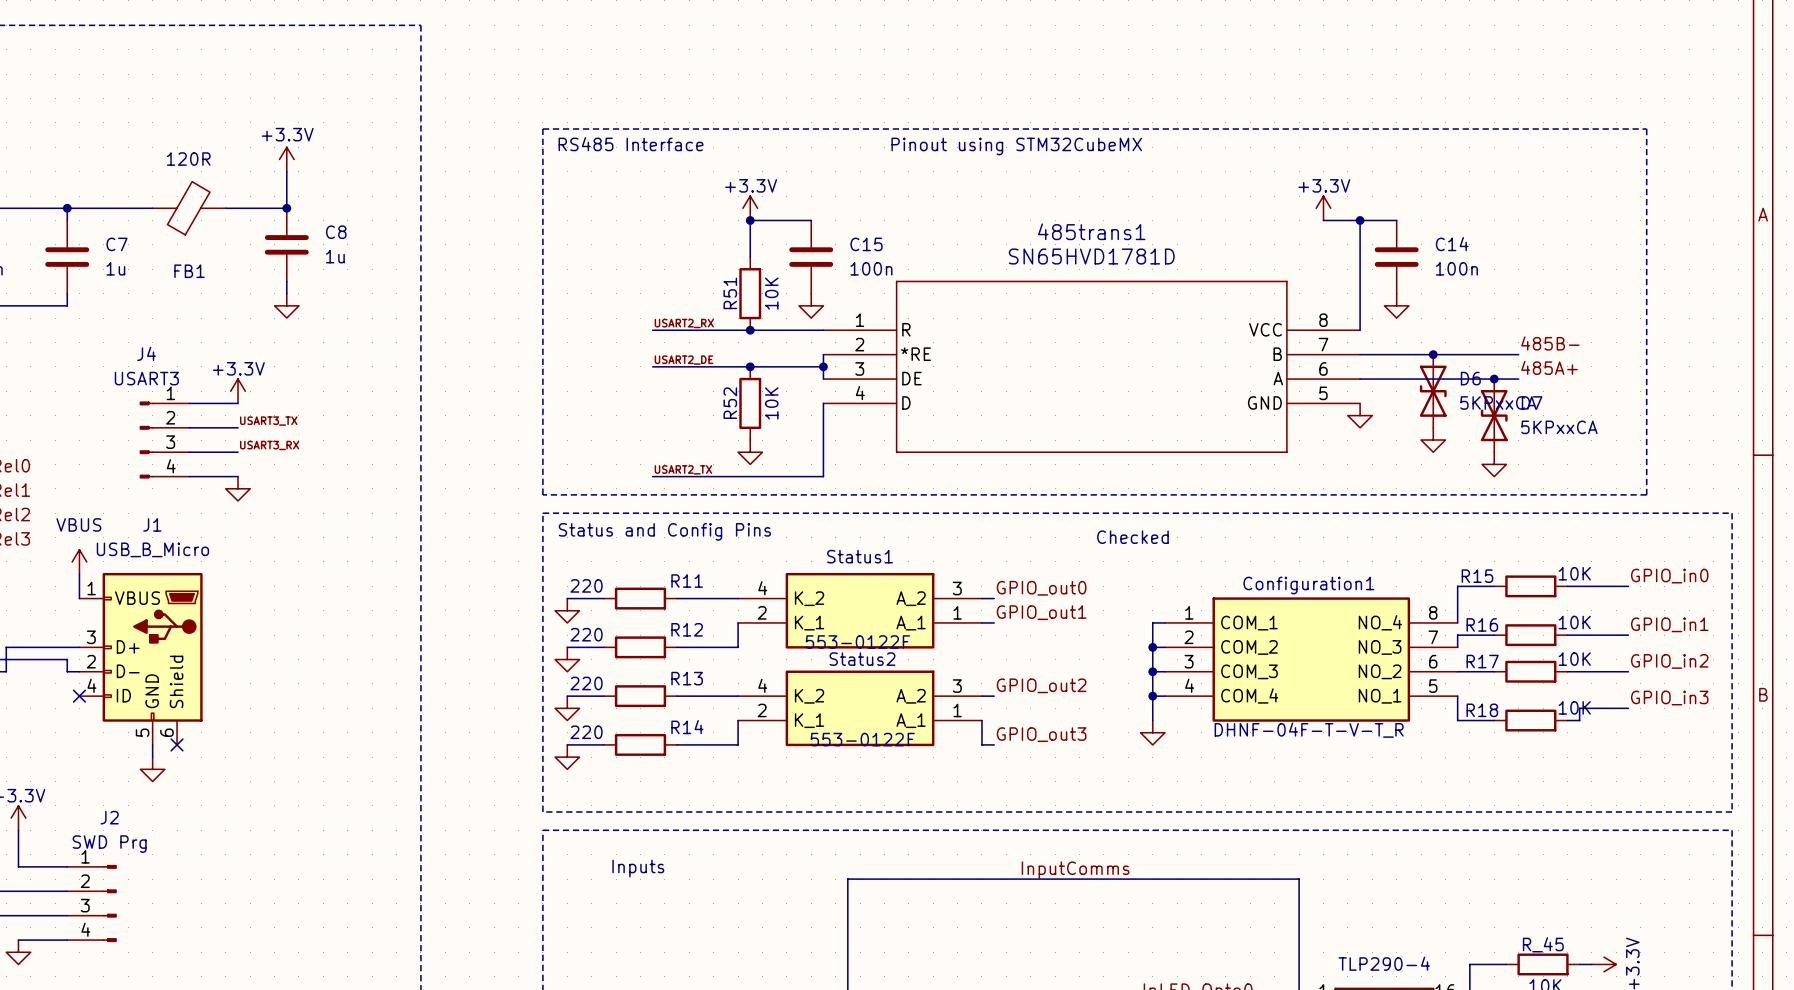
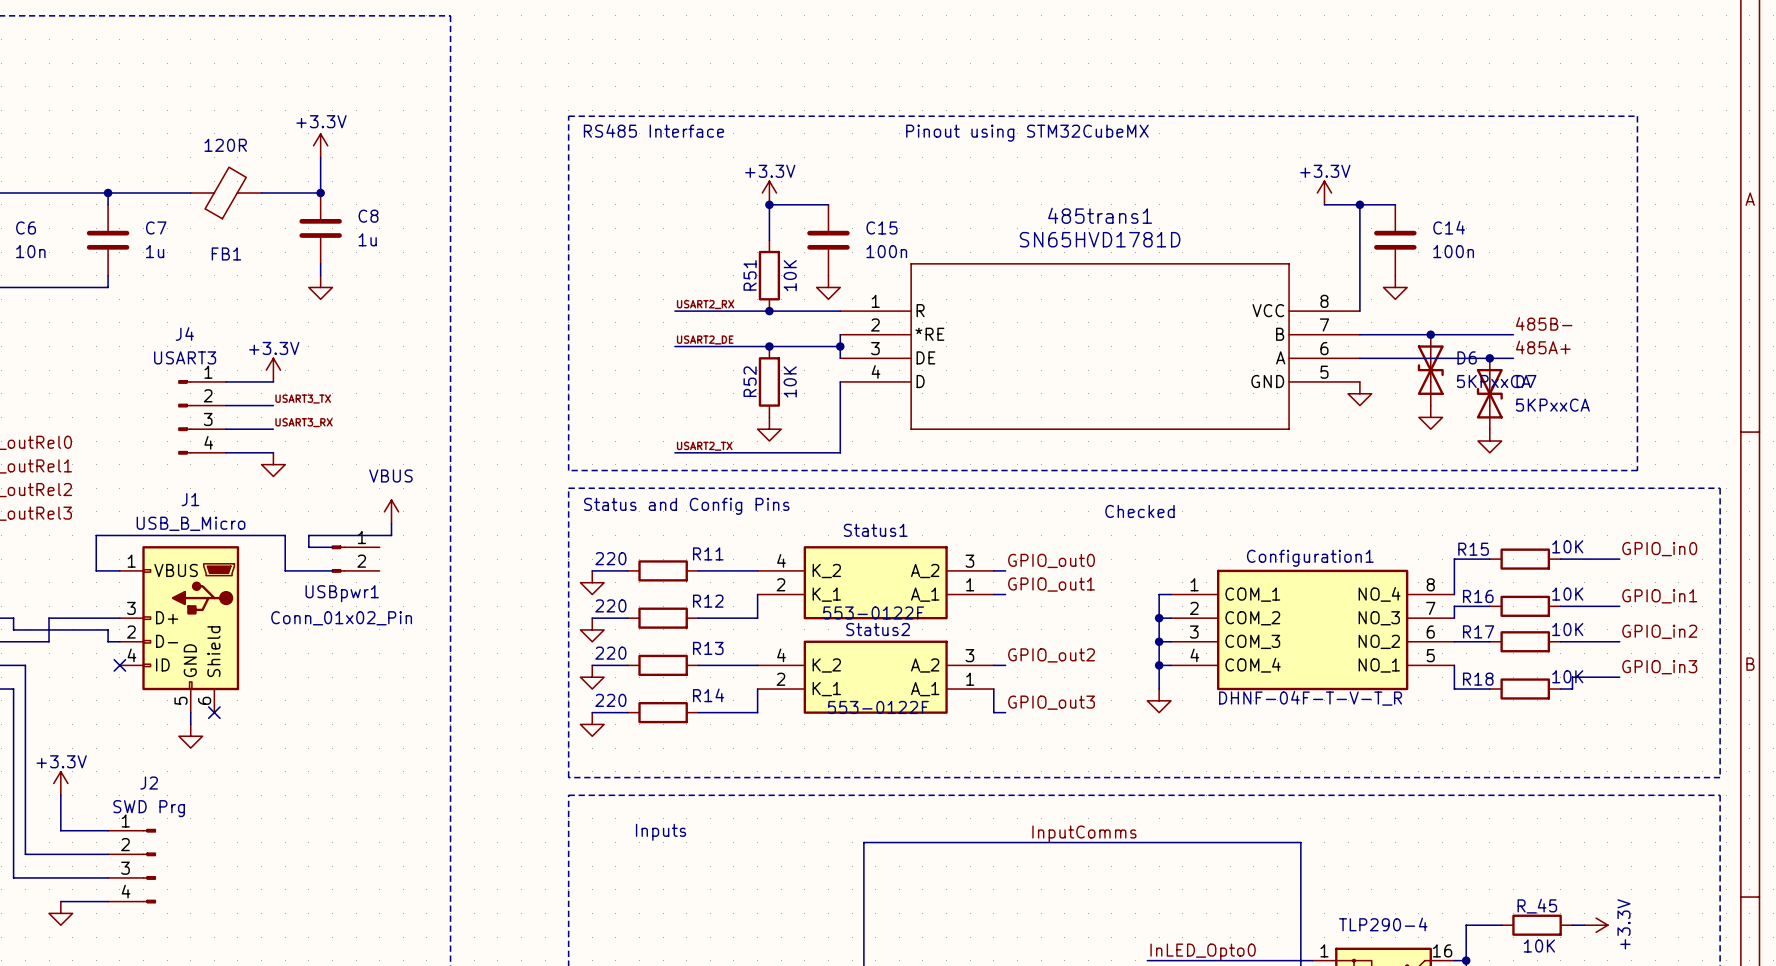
power symbol: none -> VBUS (391, 511)
wire: none -> (391, 523) (391, 535) (308, 535) (308, 547) (332, 547)
power symbol: VBUS (79, 561) -> none
wire: (79, 574) (79, 598) -> (332, 570) (285, 570) (285, 535) (96, 535) (96, 570) (119, 570)
USBpwr1: none -> Conn_01x02_Pin (355, 559)

